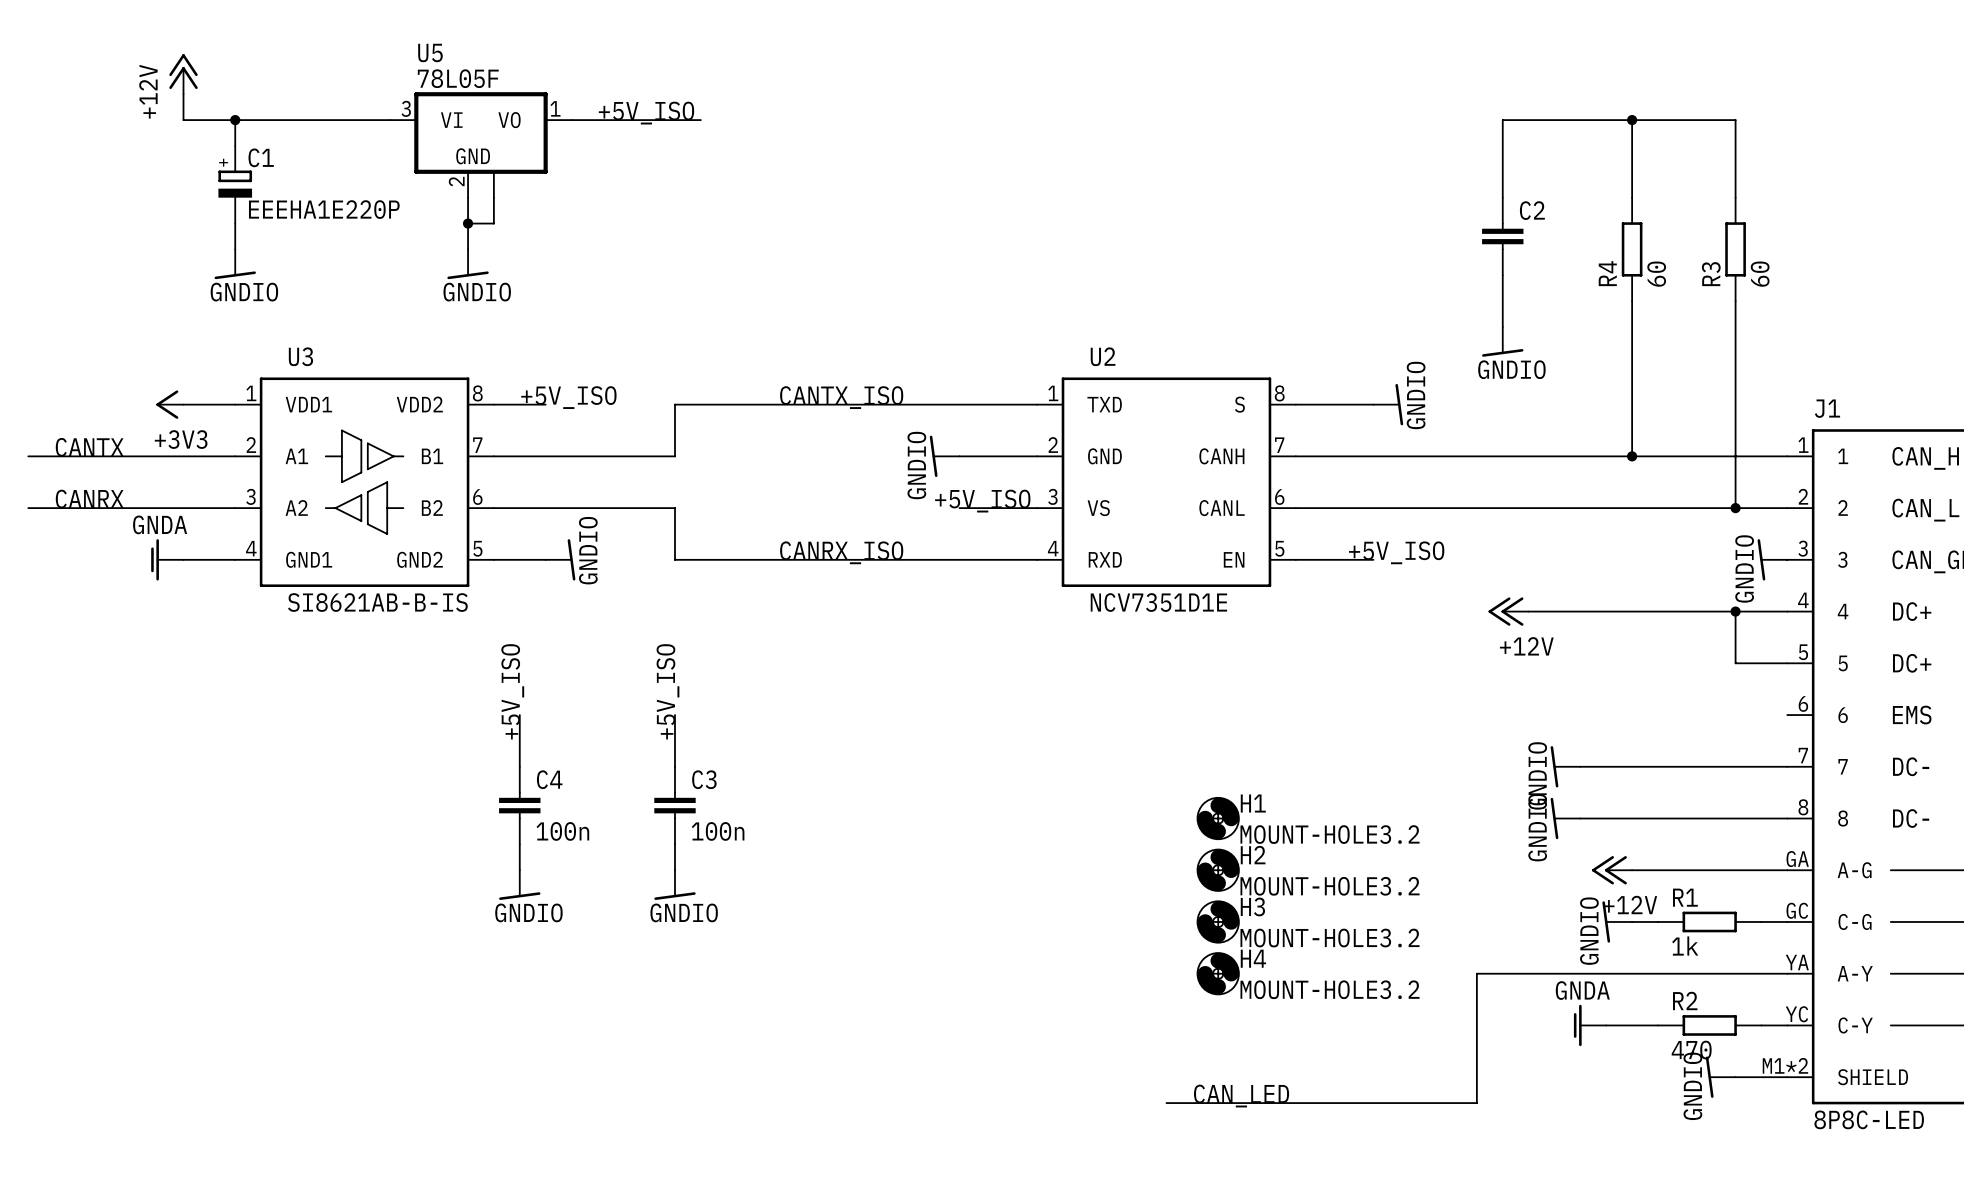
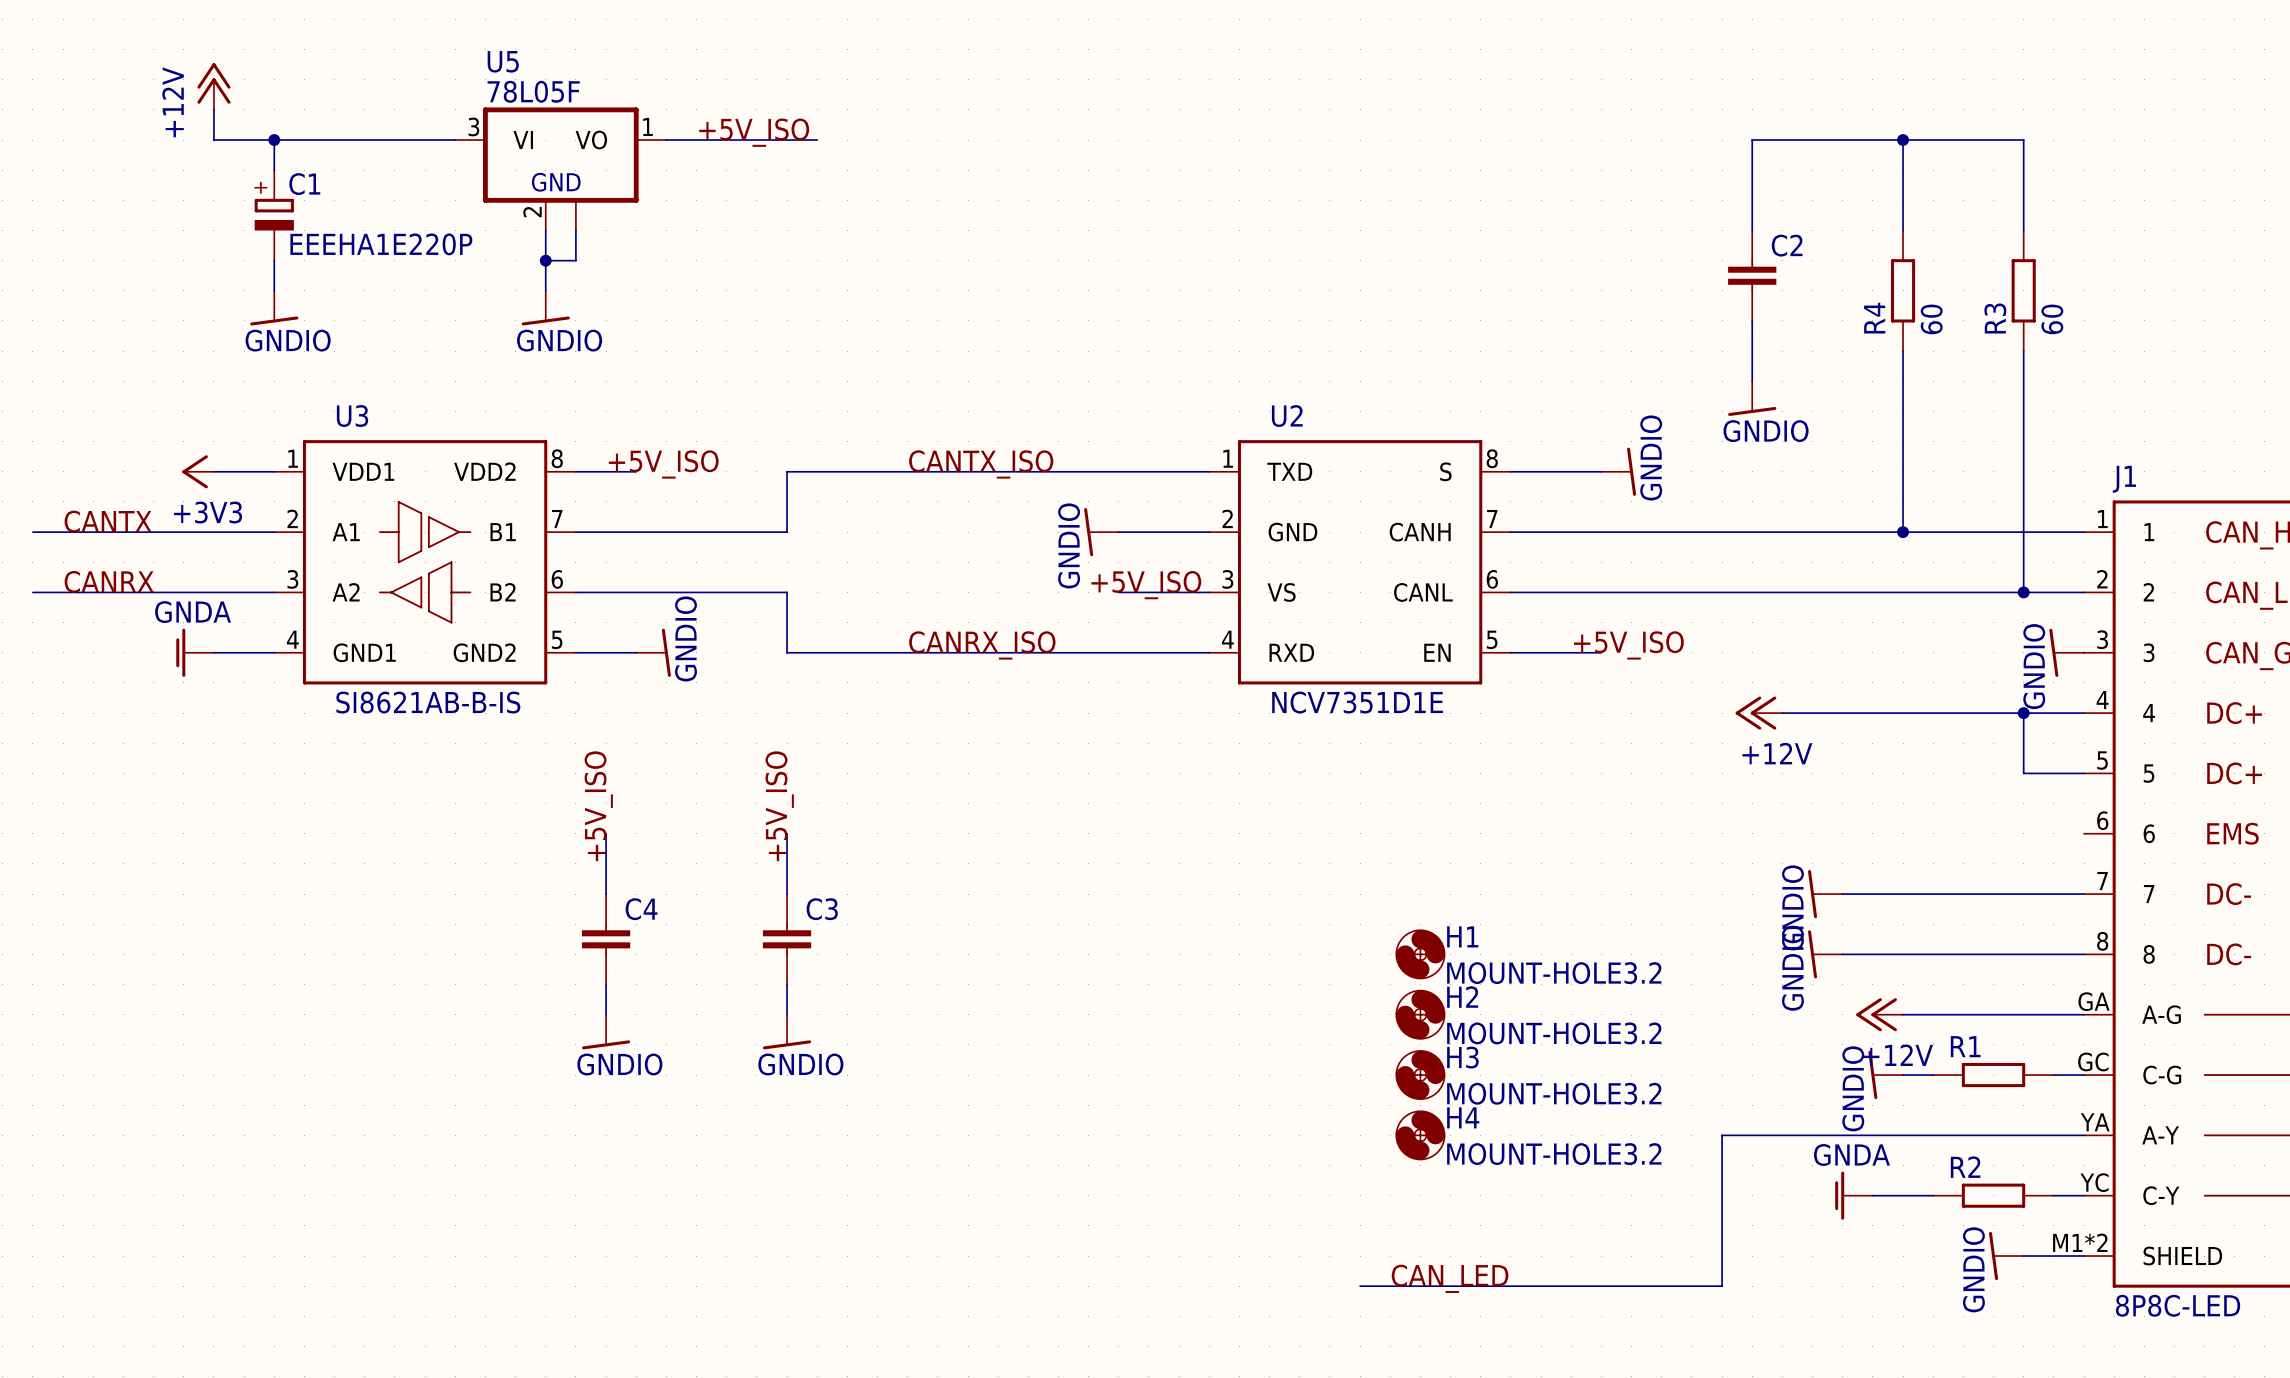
C4 value: 100n (562, 831) -> none
C3 value: 100n (718, 831) -> none
R1 value: 1k (1685, 946) -> none
R2 value: 470 (1691, 1050) -> none

